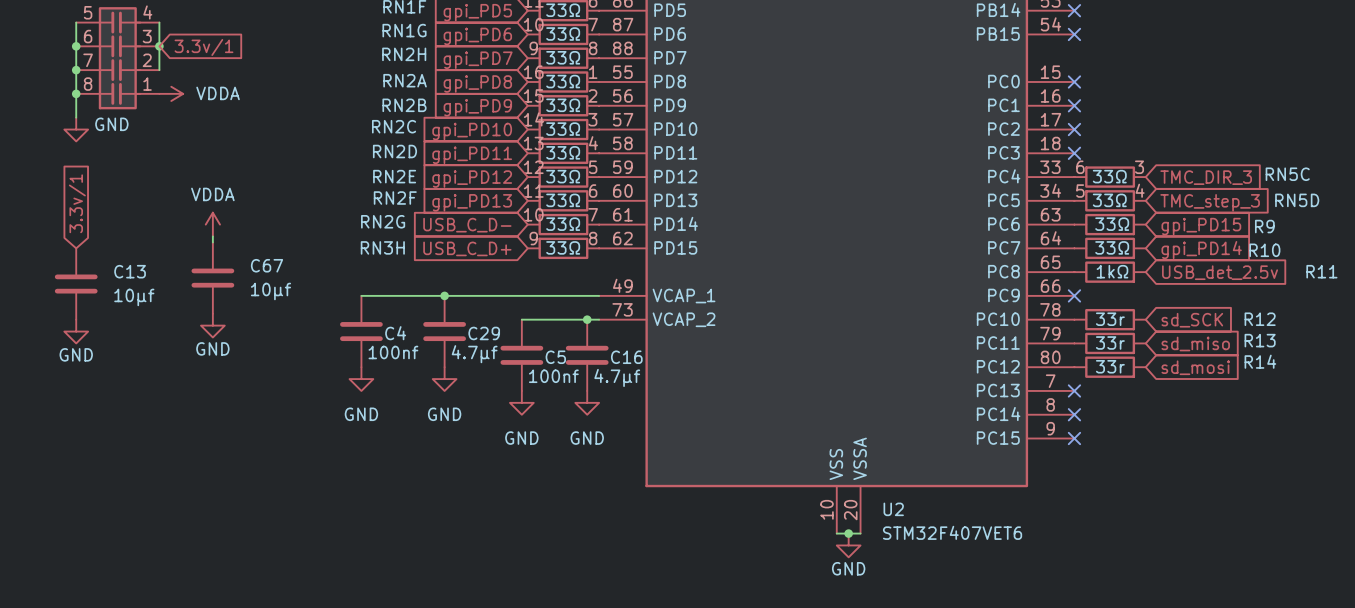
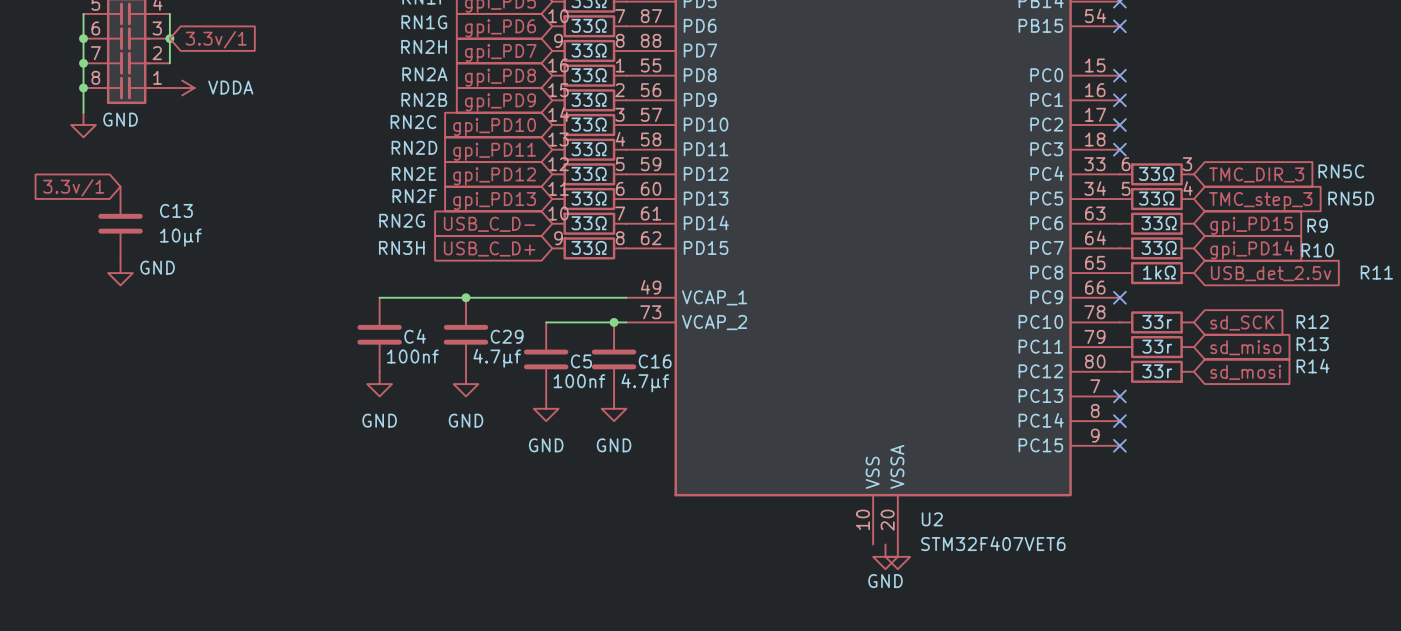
global label rotation: 0° (77, 203) -> 90° counterclockwise (73, 187)
power symbol: VDDA (212, 224) -> none
wire: (212, 236) (212, 242) -> none
power symbol: none -> GND (120, 273)
C67: 10µf (212, 278) -> none
C13 position: (76, 284) -> (120, 223)
power symbol: GND (212, 325) -> none
power symbol: GND (76, 331) -> none
wire: (836, 533) (860, 533) -> none
junction: (848, 533) -> none
power symbol: none -> (897, 556)

